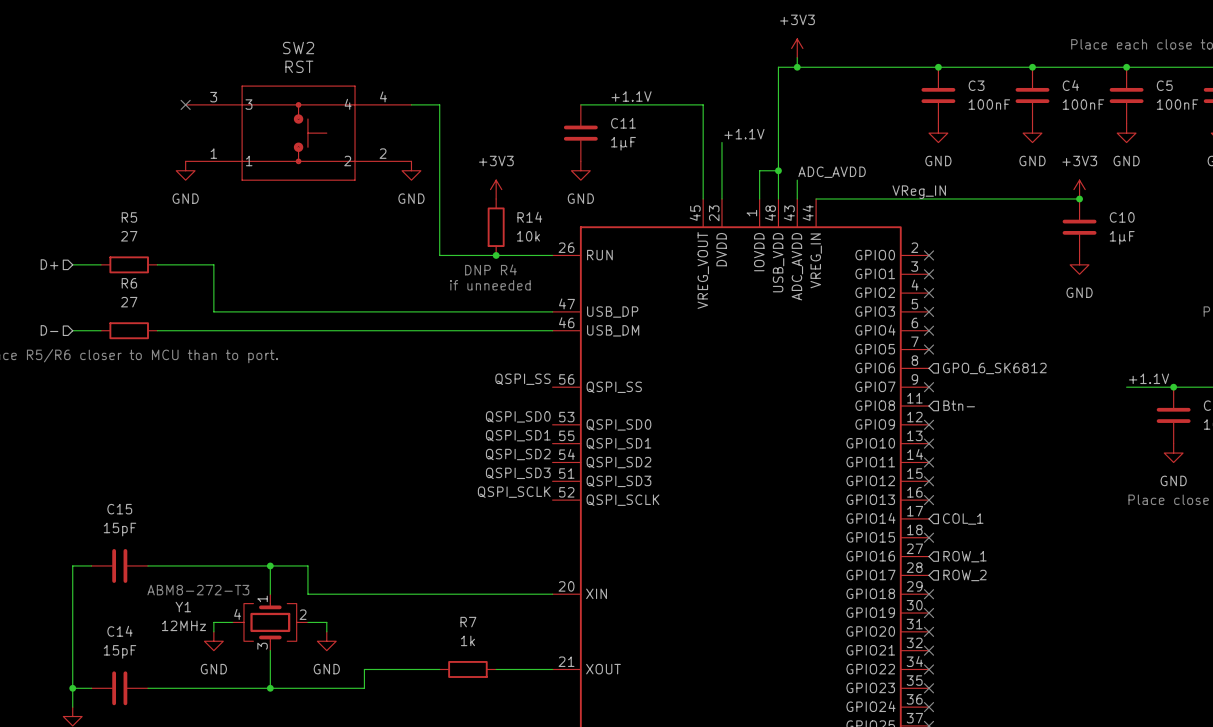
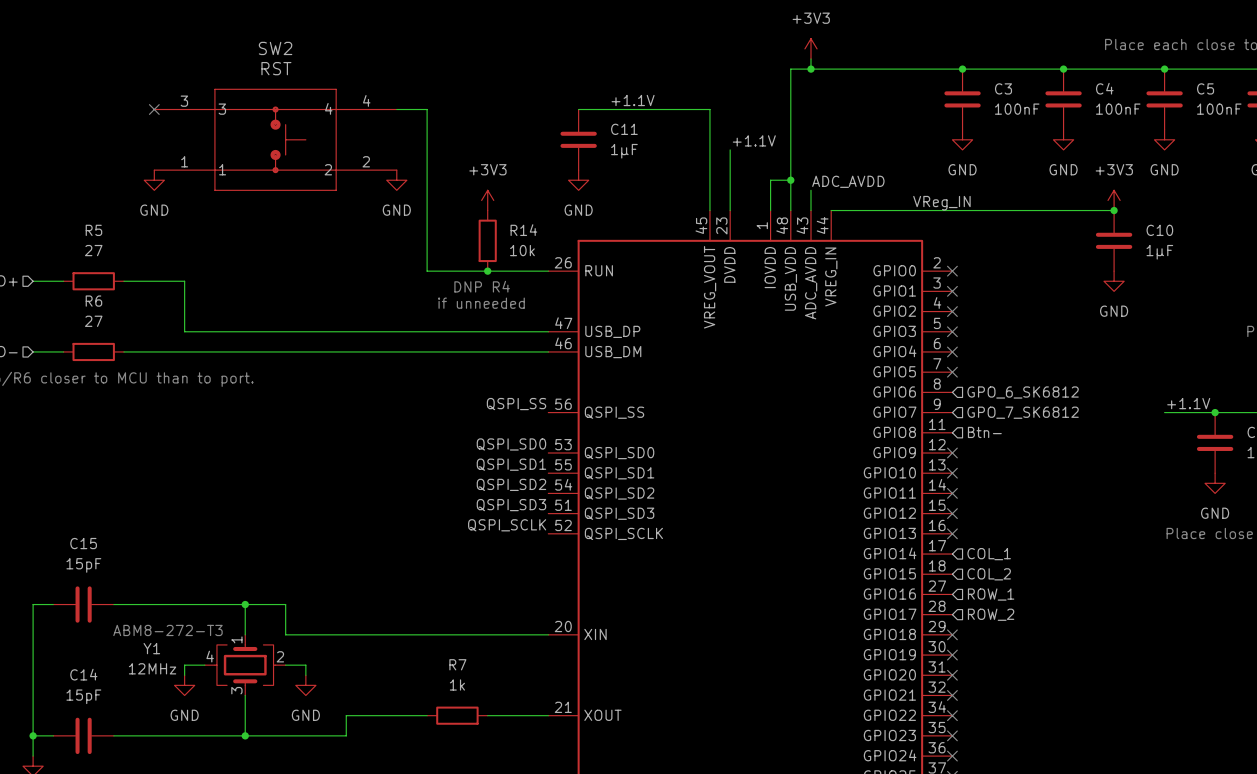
no-connect mark: (929, 387) -> none
hierarchical label: none -> GPO_7_SK6812 (1023, 412)
no-connect mark: (929, 537) -> none
hierarchical label: none -> COL_2 (989, 574)

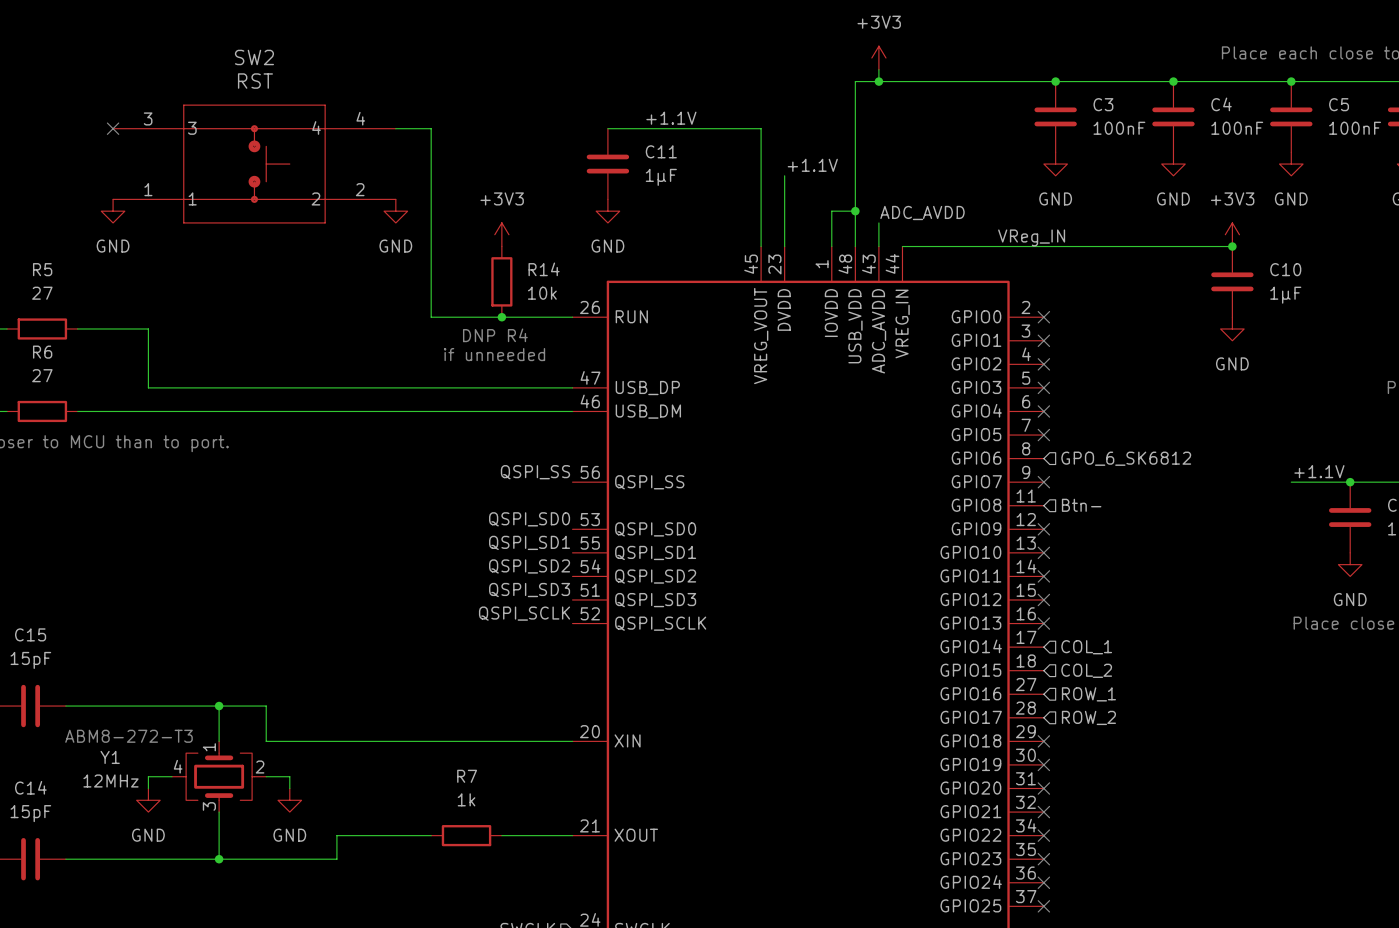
no-connect mark: none -> (1043, 482)
hierarchical label: GPO_7_SK6812 (1023, 412) -> none

